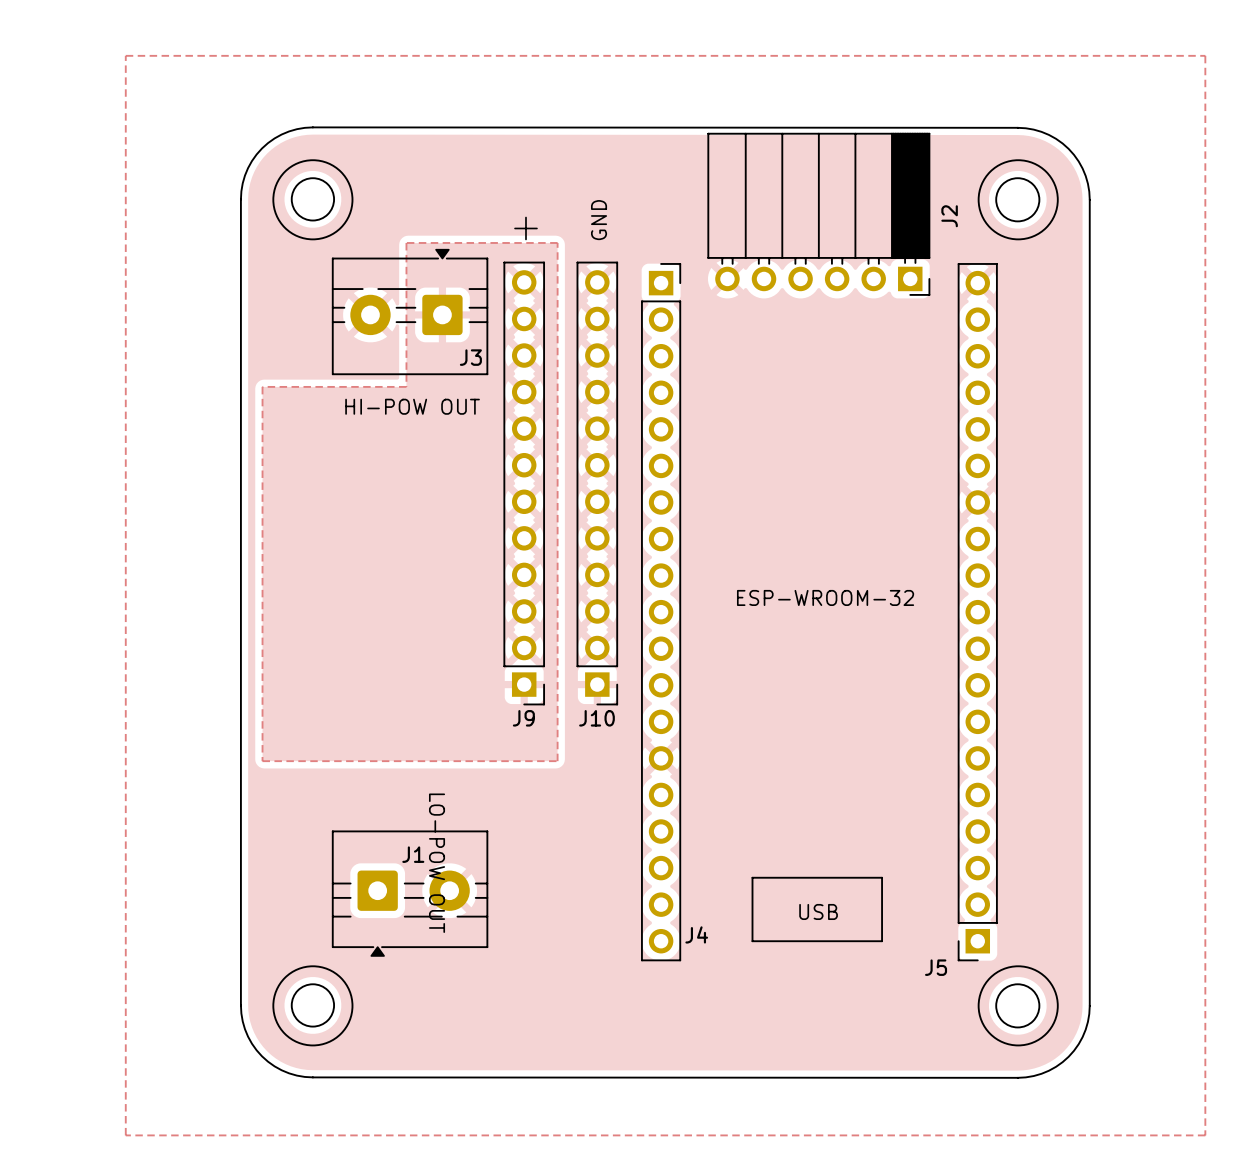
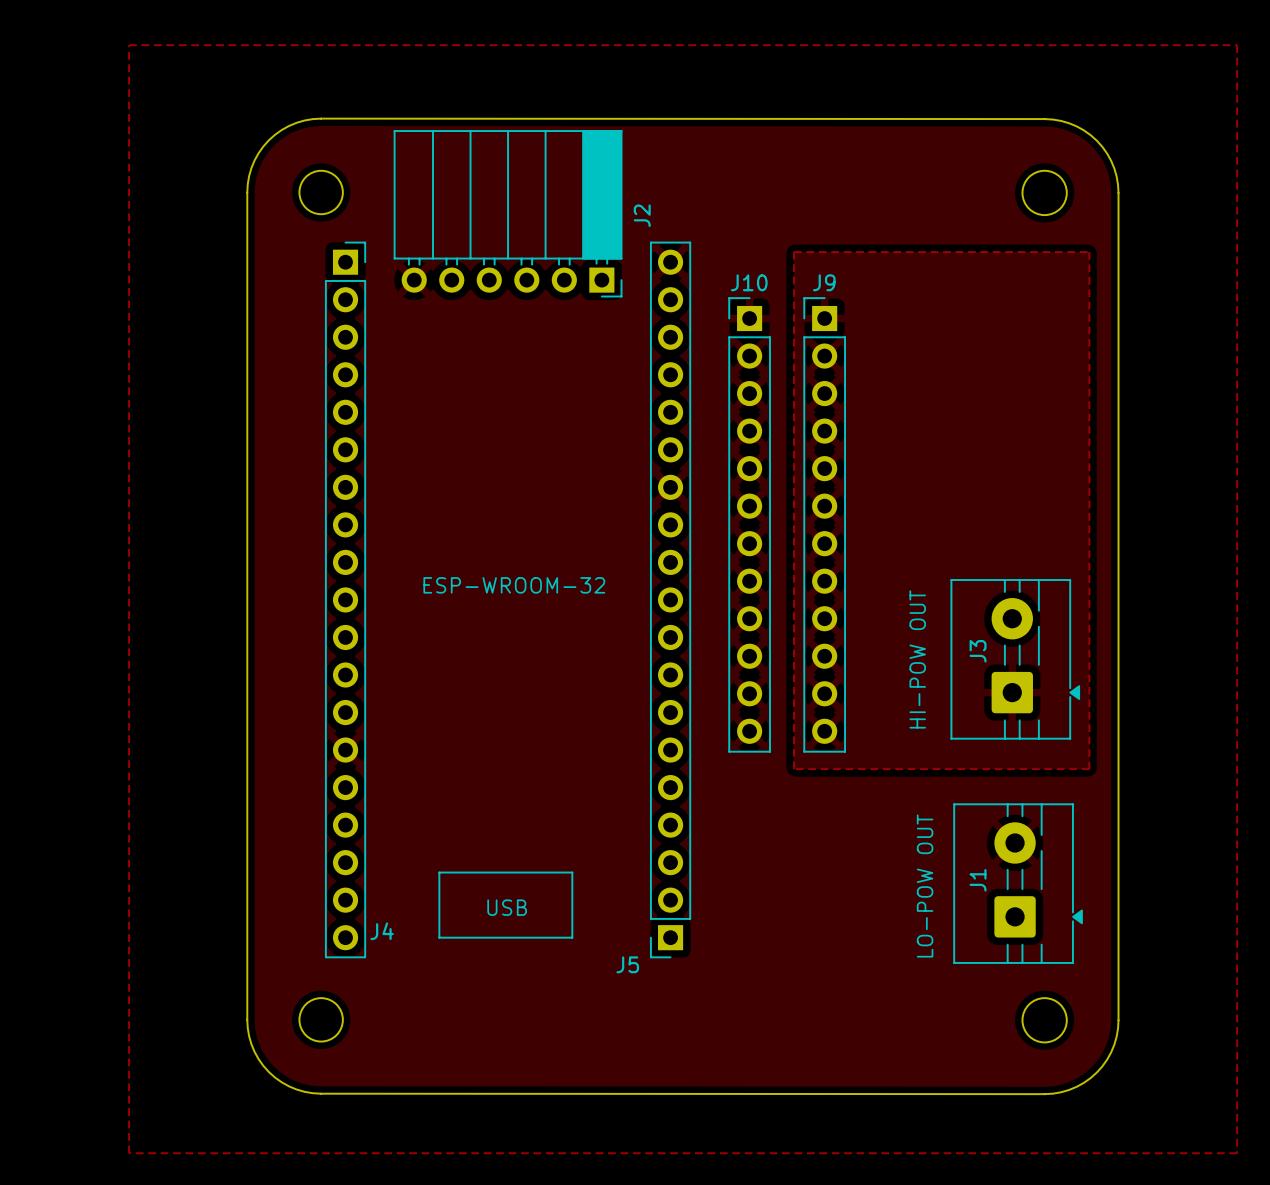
drawing: [272, 159, 354, 241] -> none
drawing: [977, 159, 1059, 241] -> none
J2 position: (818, 214) -> (508, 213)
text: GND (599, 220) -> none
text: + (525, 228) -> none
zone outline: (406, 242) (557, 242) (557, 761) (262, 761) (262, 386) (406, 386) (406, 242) -> none
zone outline: none -> (793, 252) (1089, 252) (1089, 769) (793, 769) (793, 252)
J3 rotation: 0° (410, 311) -> 90° clockwise (1015, 659)
J3 position: (410, 311) -> (1015, 659)
J3 name position: J3 (470, 357) -> J3 (978, 651)
text: HI-POW OUT (412, 406) -> none
J9 rotation: 0° (524, 483) -> 180° (824, 524)
J9 position: (524, 483) -> (824, 524)
J10 rotation: 0° (597, 483) -> 180° (749, 524)
text position: ESP-WROOM-32 (825, 597) -> ESP-WROOM-32 (514, 585)
J4 position: (661, 612) -> (345, 599)
J5 position: (977, 612) -> (670, 599)
text: none -> HI-POW OUT (917, 659)
text: LO-POW OUT (437, 863) -> none
text: none -> LO-POW OUT (925, 885)
line: (752, 877) (882, 877) (882, 941) (752, 941) (752, 877) -> (439, 872) (572, 872) (572, 937) (439, 937) (439, 872)
J1 rotation: 0° (410, 893) -> 90° counterclockwise (1018, 883)
J1 position: (410, 893) -> (1018, 883)
text position: USB (818, 911) -> USB (507, 907)
drawing: [272, 965, 354, 1047] -> none
drawing: [977, 965, 1059, 1047] -> none

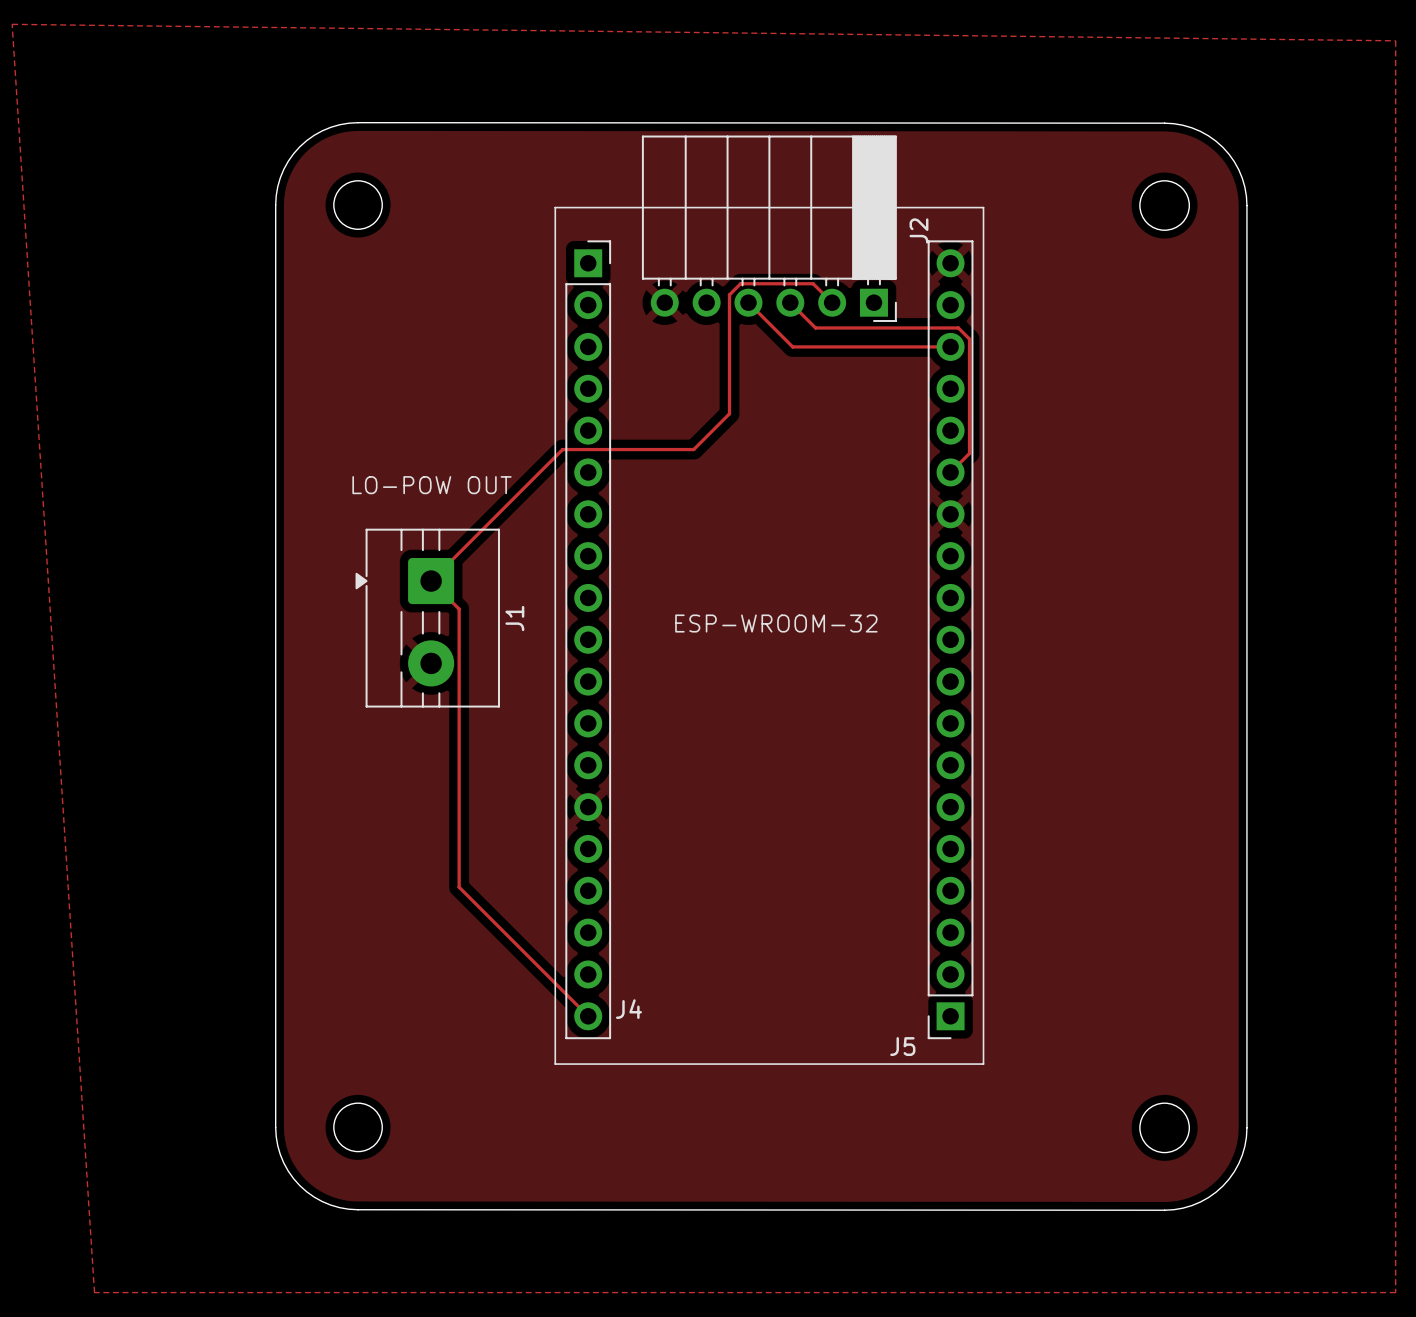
zone outline: (129, 45) (1237, 45) (1237, 1153) (129, 1153) (129, 45) -> (12, 24) (94, 1292) (1395, 1292) (1395, 40) (12, 24)
line: none -> (555, 207) (983, 207) (983, 1064) (555, 1064) (555, 207)
J2 position: (508, 213) -> (769, 228)
zone outline: (793, 252) (1089, 252) (1089, 769) (793, 769) (793, 252) -> none
track: none -> (748, 302) (792, 346) (950, 346)
track: none -> (790, 302) (815, 327) (958, 327) (969, 339) (969, 453) (950, 472)
track: none -> (832, 302) (813, 283) (740, 283) (729, 294) (729, 413) (693, 449) (562, 449) (431, 581) (459, 609) (459, 887) (588, 1016)
text: none -> LO-POW OUT (431, 485)
J10: (749, 524) -> none
J9: (824, 524) -> none
text position: ESP-WROOM-32 (514, 585) -> ESP-WROOM-32 (776, 623)
J4 position: (345, 599) -> (588, 639)
J5 position: (670, 599) -> (950, 639)
text: HI-POW OUT (917, 659) -> none
J3: (1015, 659) -> none
line: (439, 872) (572, 872) (572, 937) (439, 937) (439, 872) -> none
J1 name position: J1 (978, 880) -> J1 (514, 618)
J1 rotation: 0° (1018, 883) -> 180° (427, 618)
J1 position: (1018, 883) -> (427, 618)
text: LO-POW OUT (925, 885) -> none
text: USB (507, 907) -> none

